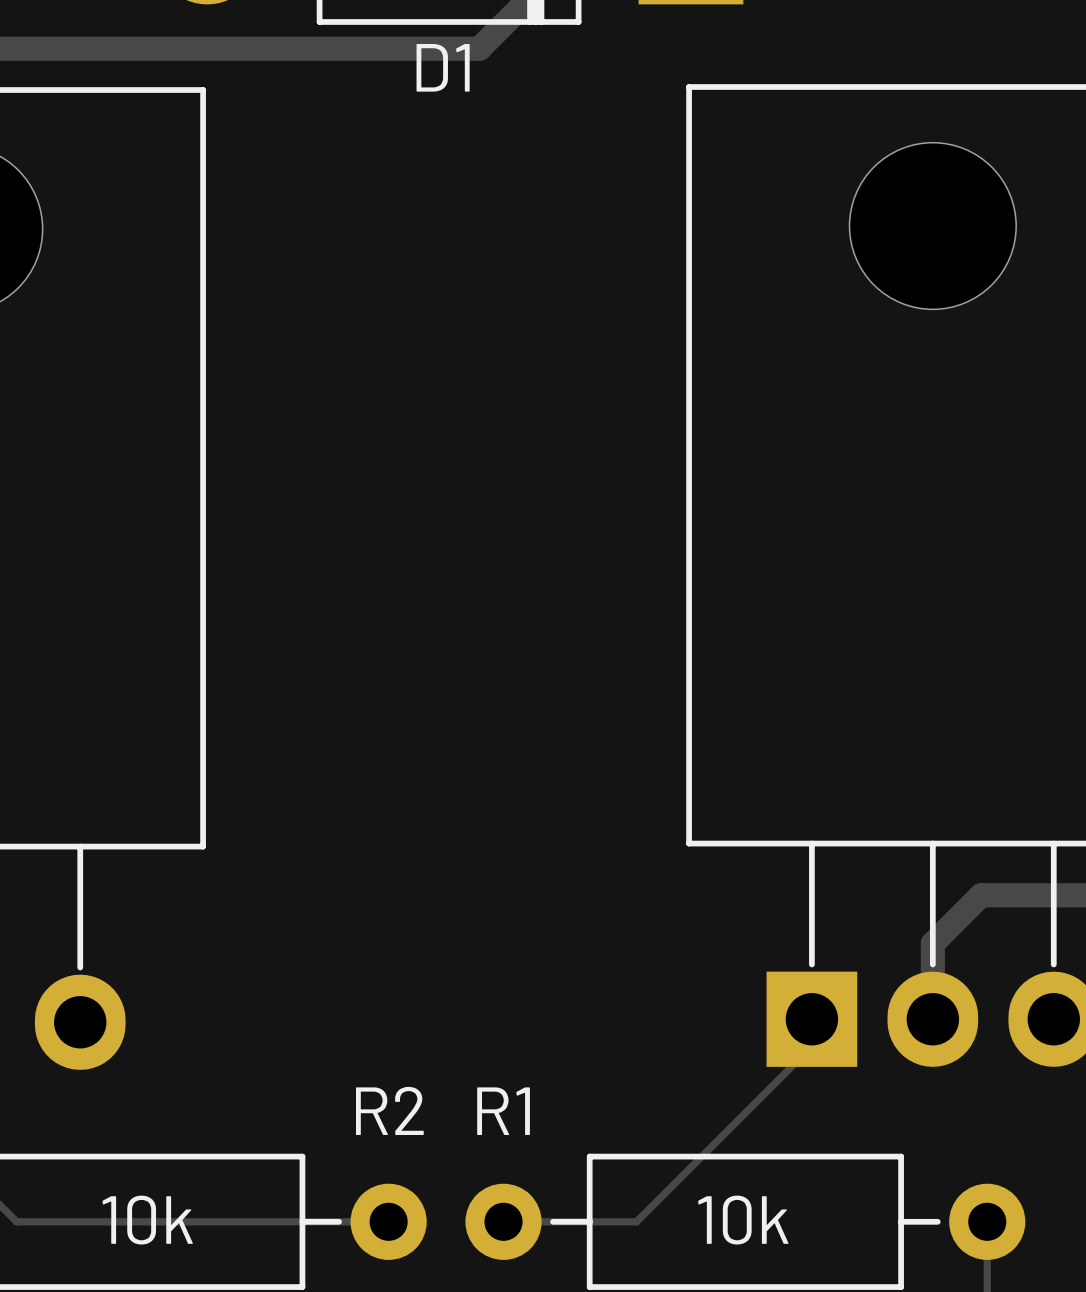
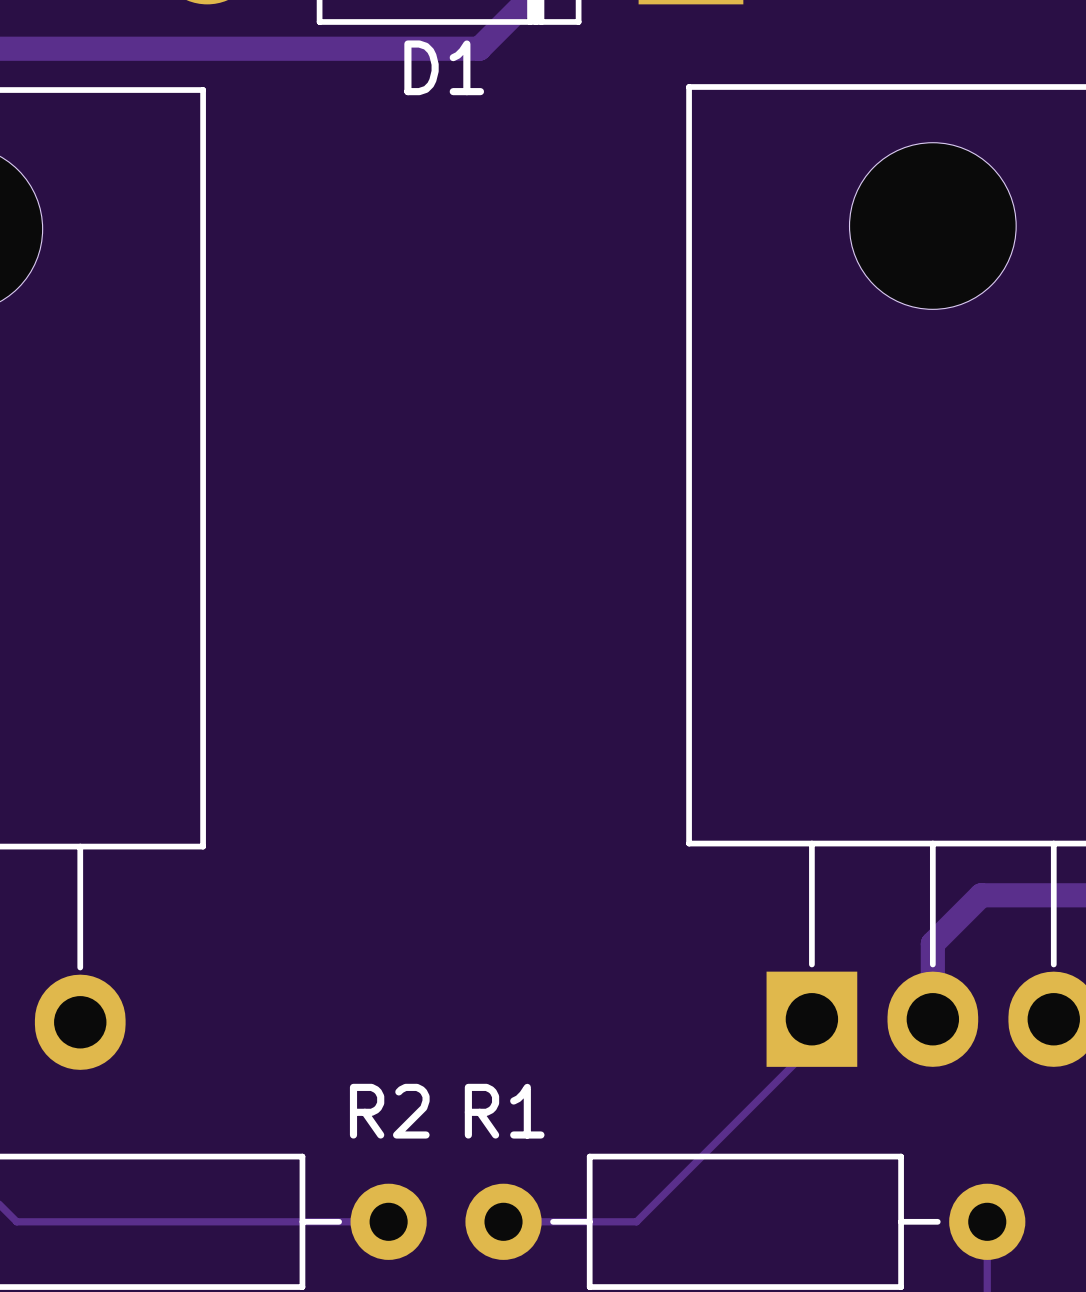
R2 value: 10k (147, 1220) -> none
R1 value: 10k (743, 1220) -> none

